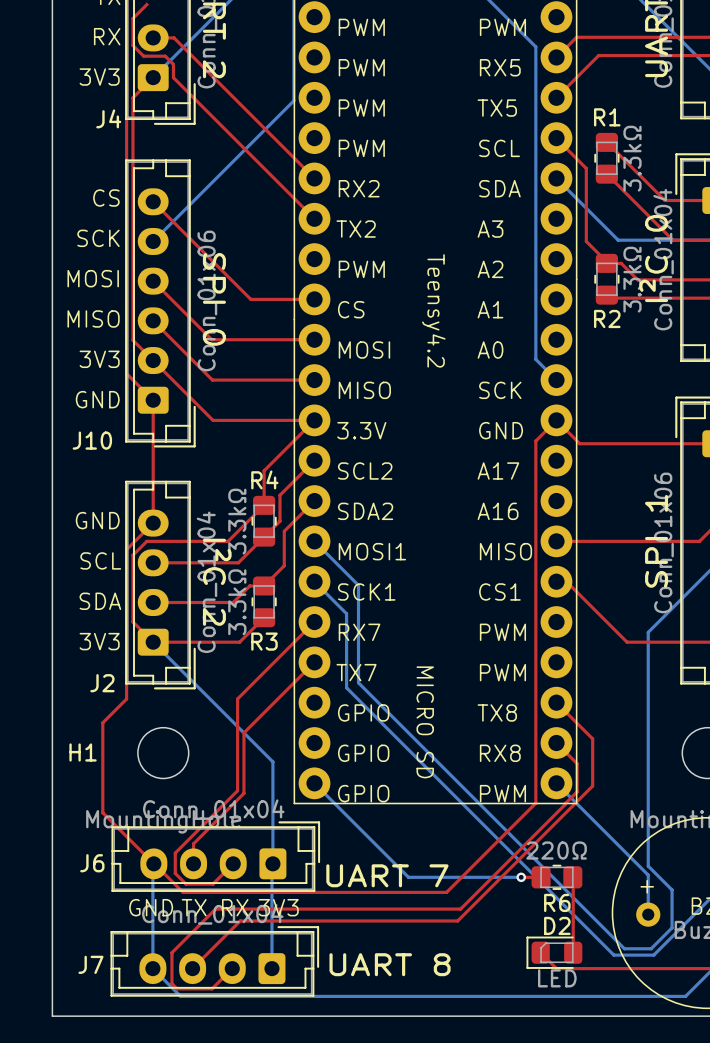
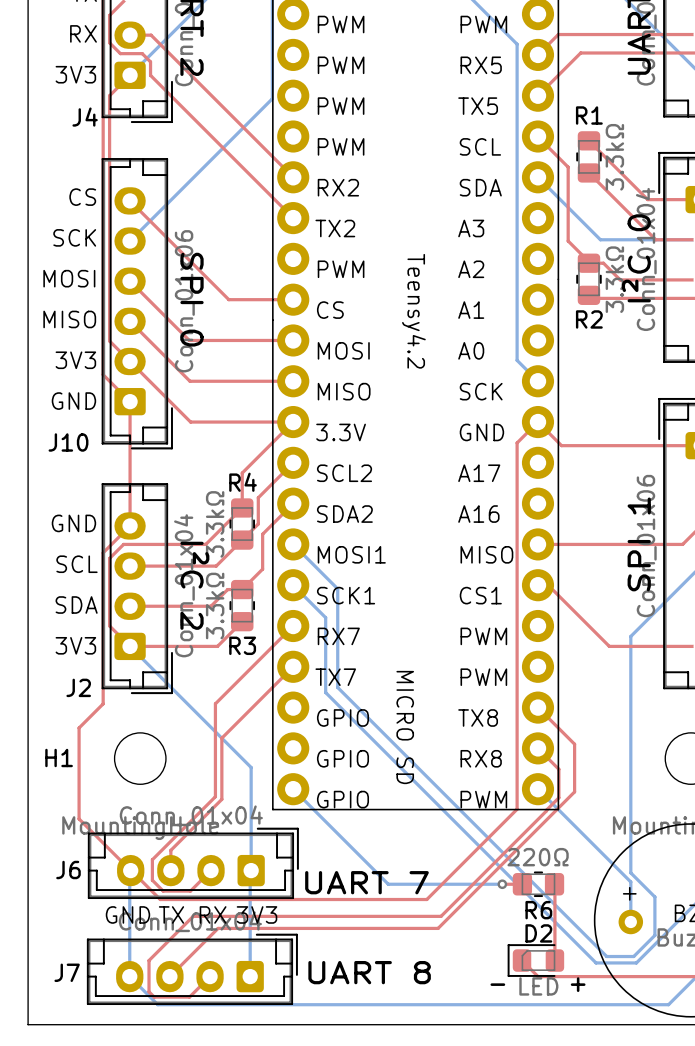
text: none -> - (497, 984)
text: none -> + (578, 984)

